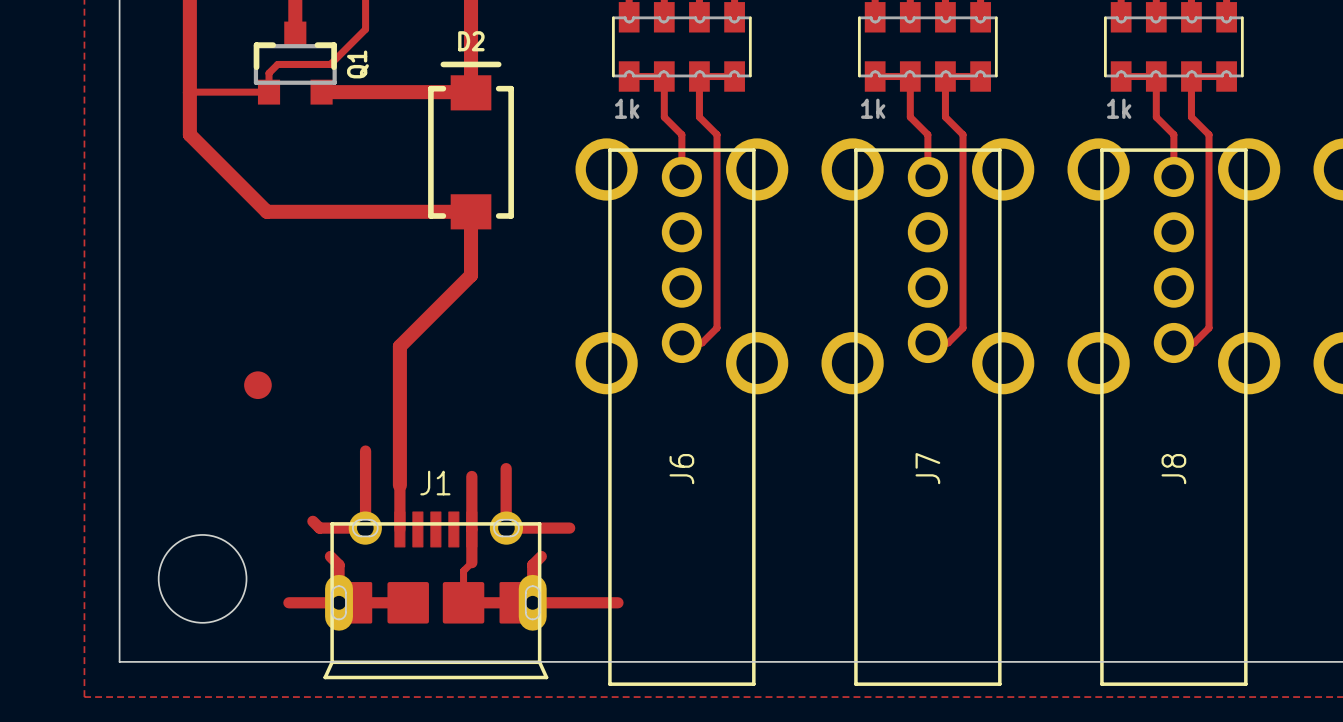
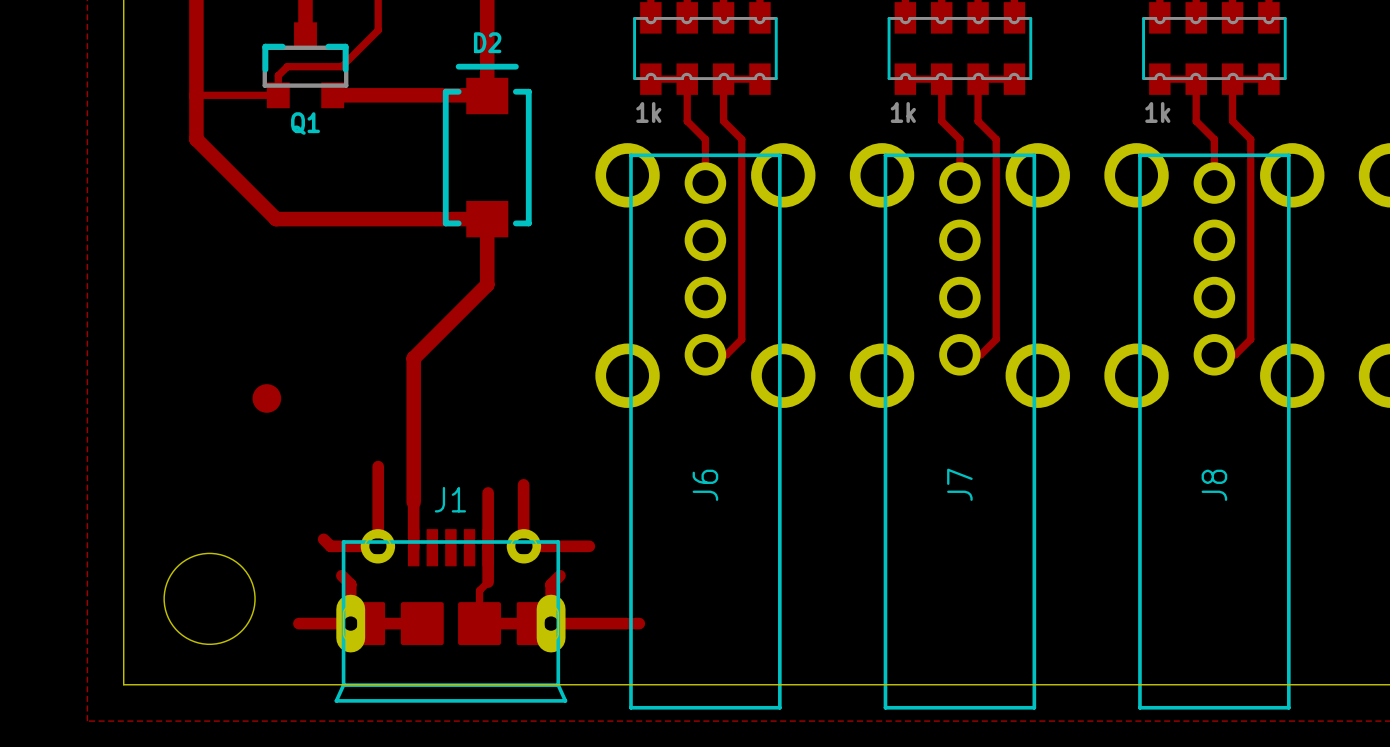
Q1 name rotation: 0° (357, 64) -> 90° clockwise (305, 123)
Q1 name position: Q1 (357, 64) -> Q1 (305, 123)

